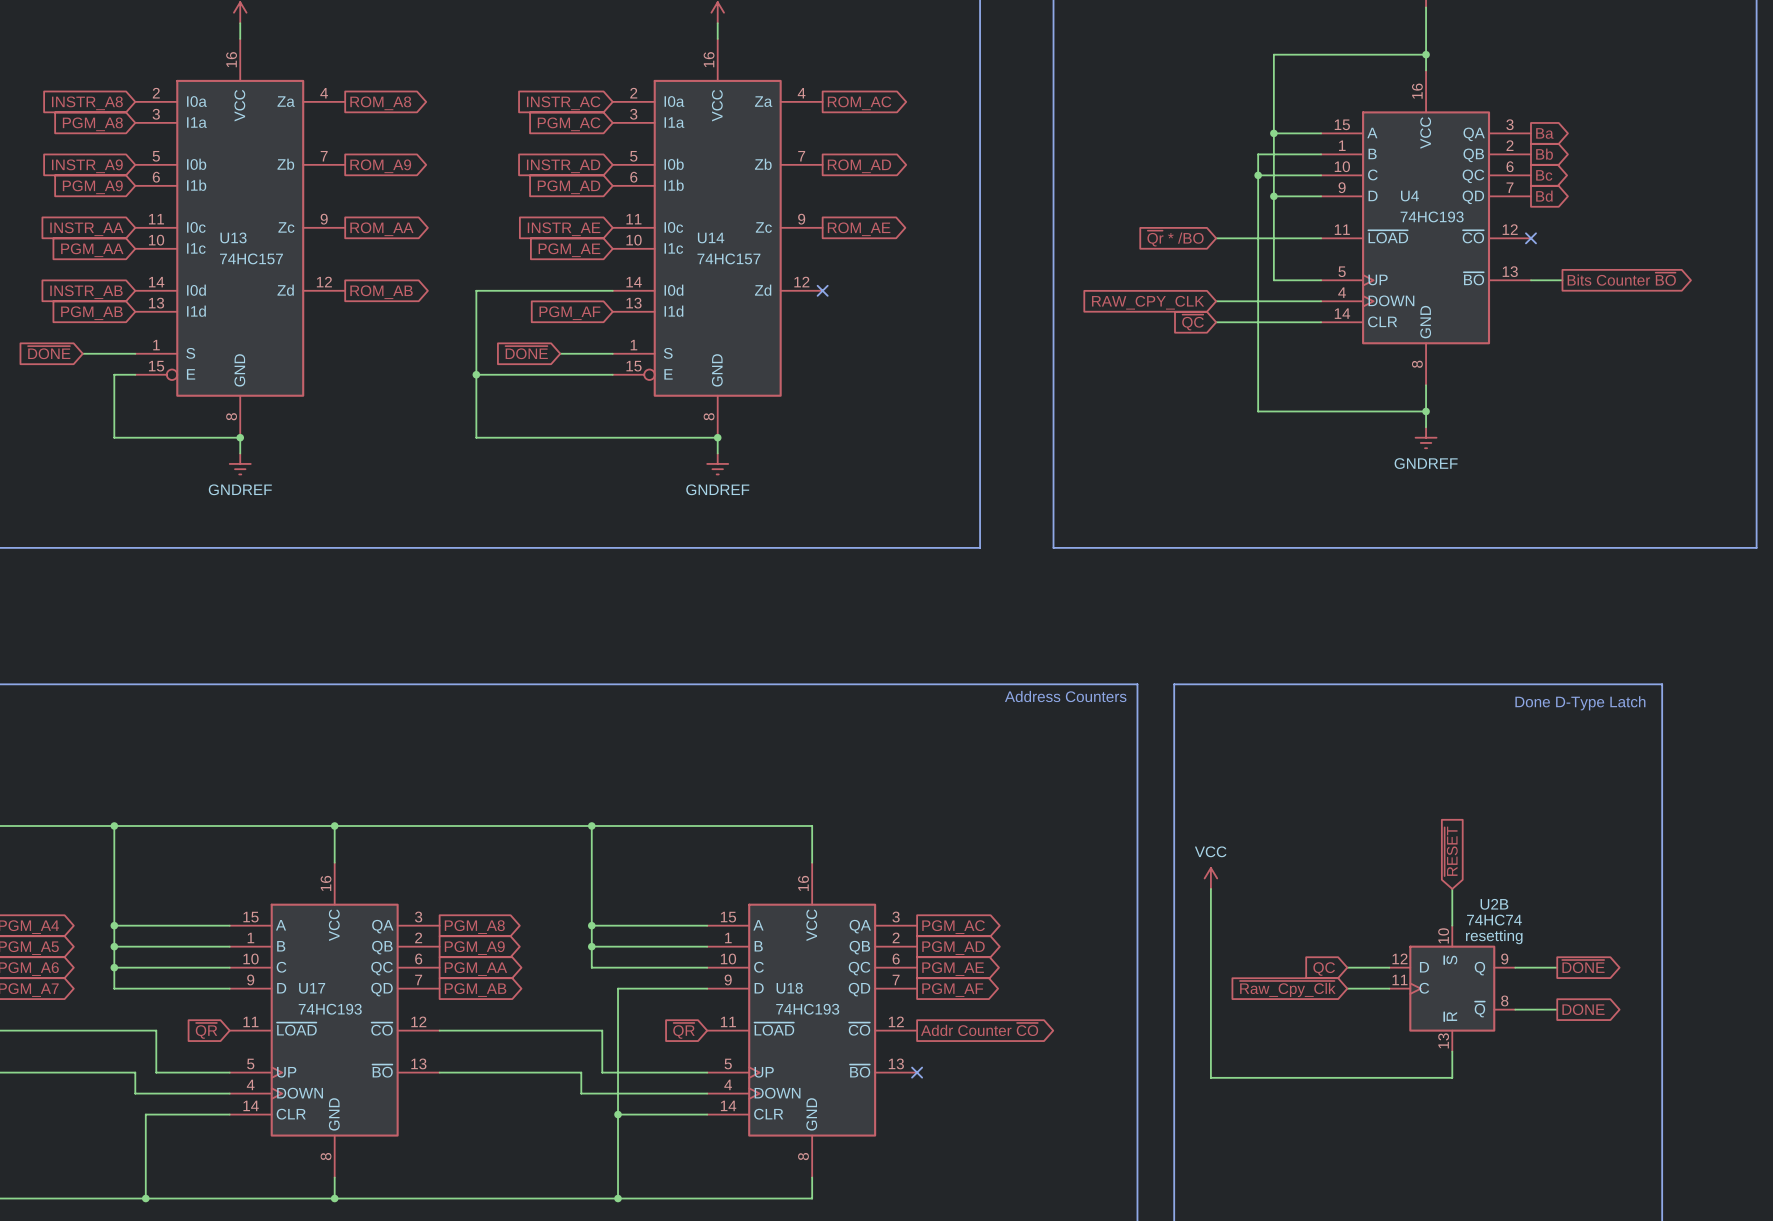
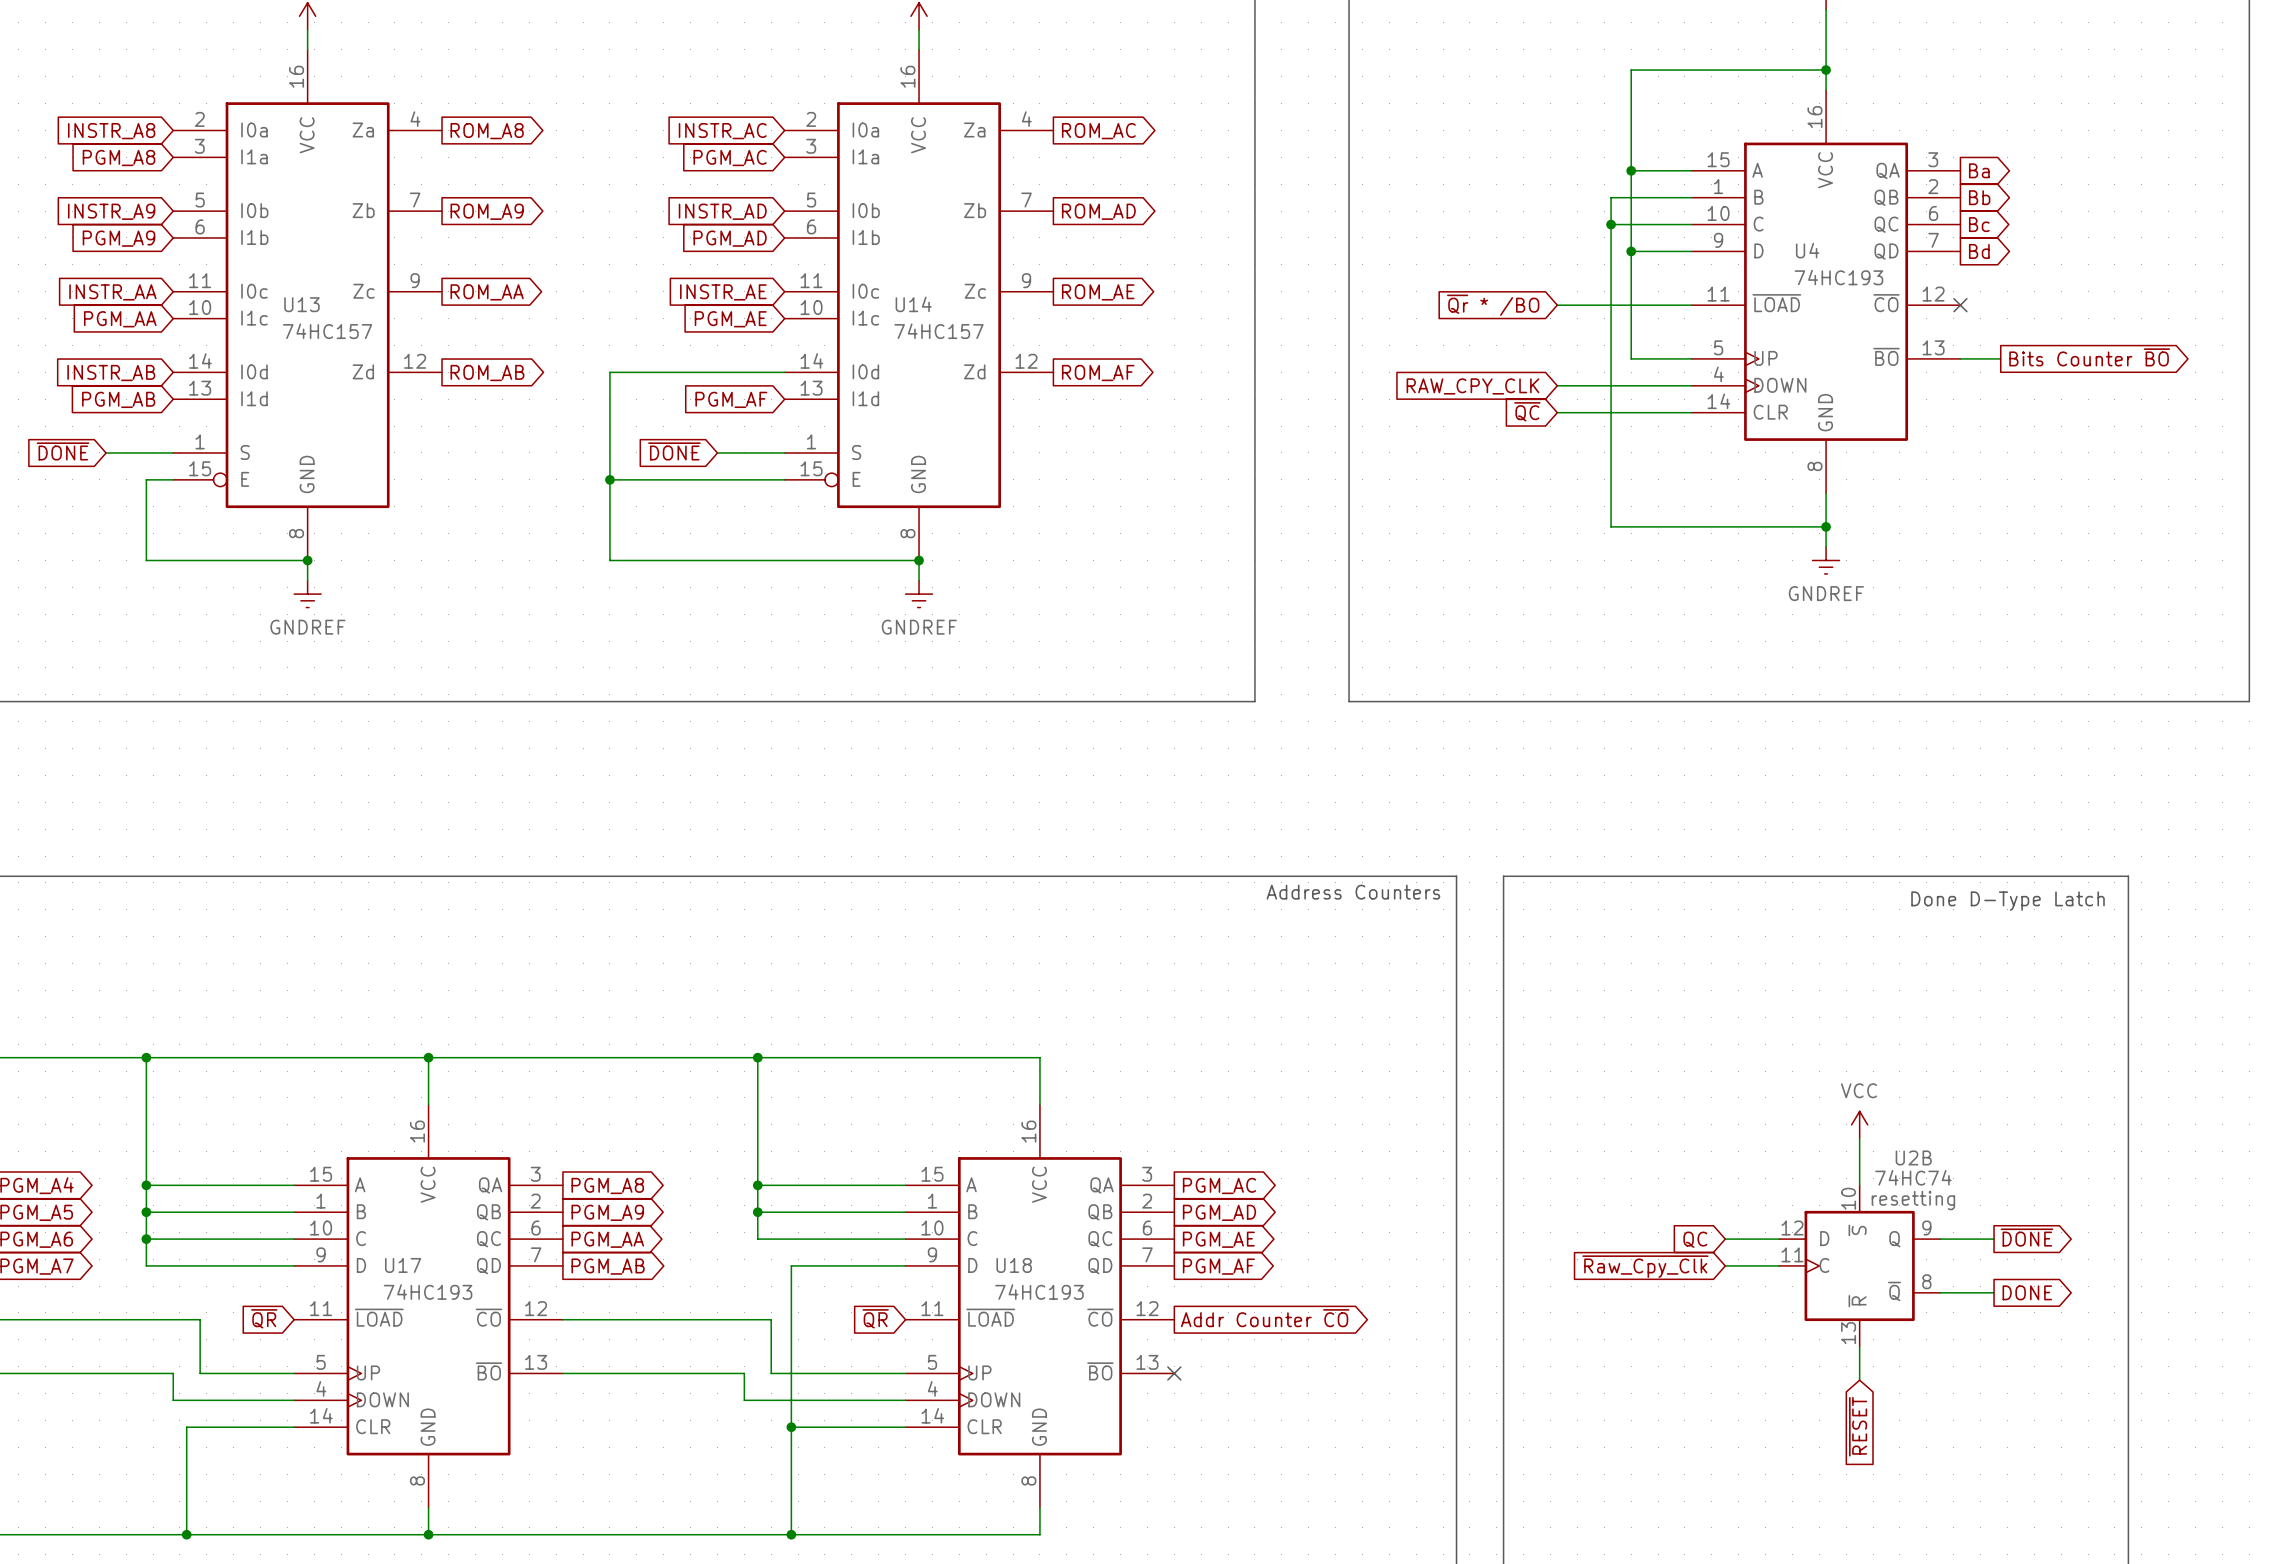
no-connect mark: (822, 290) -> none
global label: none -> ROM_AF (1098, 373)
global label rotation: 0° (1451, 851) -> 180° (1858, 1426)
global label position: ~{RESET} (1451, 851) -> ~{RESET} (1858, 1426)
power symbol: VCC (1210, 878) -> none
power symbol: none -> VCC (1859, 1124)
wire: (1210, 888) (1210, 1077) (1452, 1077) -> none

